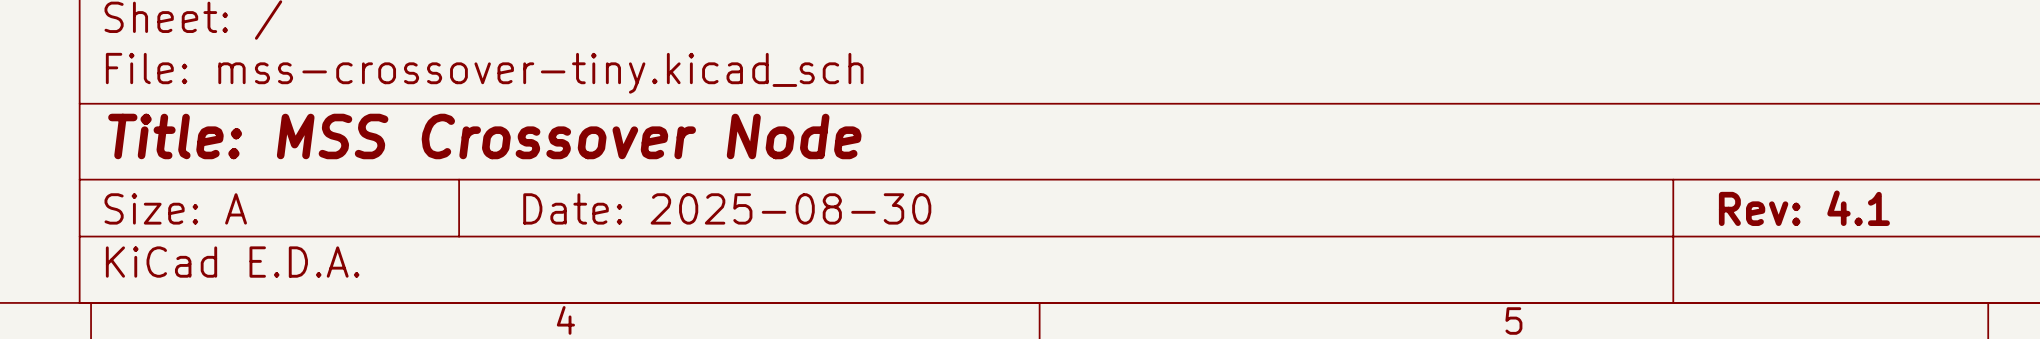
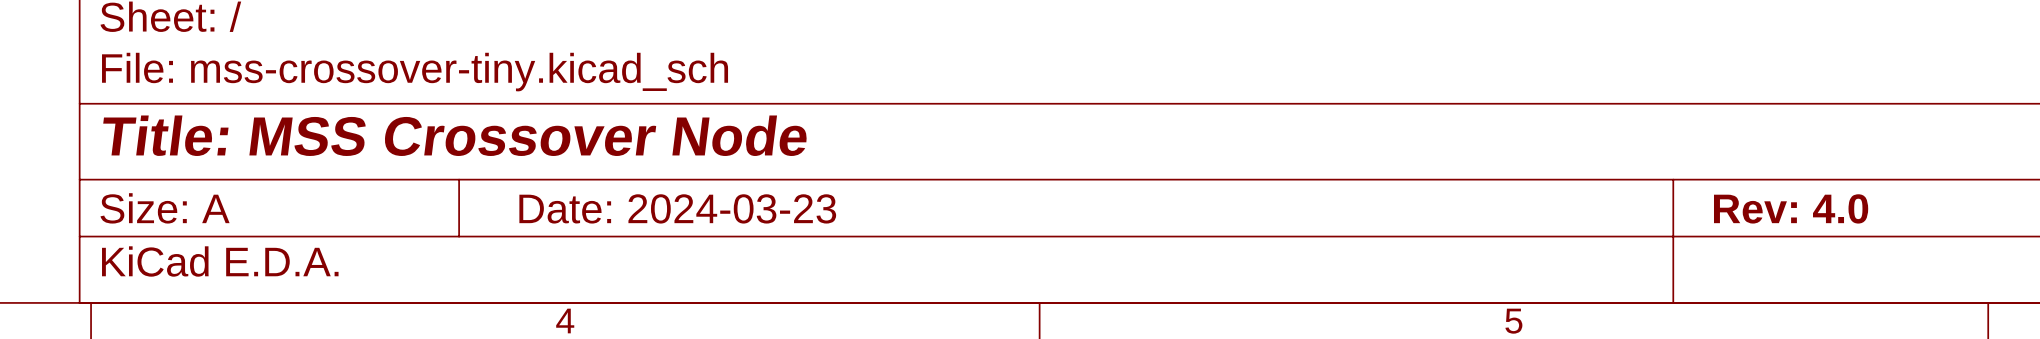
title block: Date: 2025-08-30 (727, 208) -> Date: 2024-03-23 (677, 208)
title block: Rev: 4.1 (1804, 208) -> Rev: 4.0 (1791, 208)

